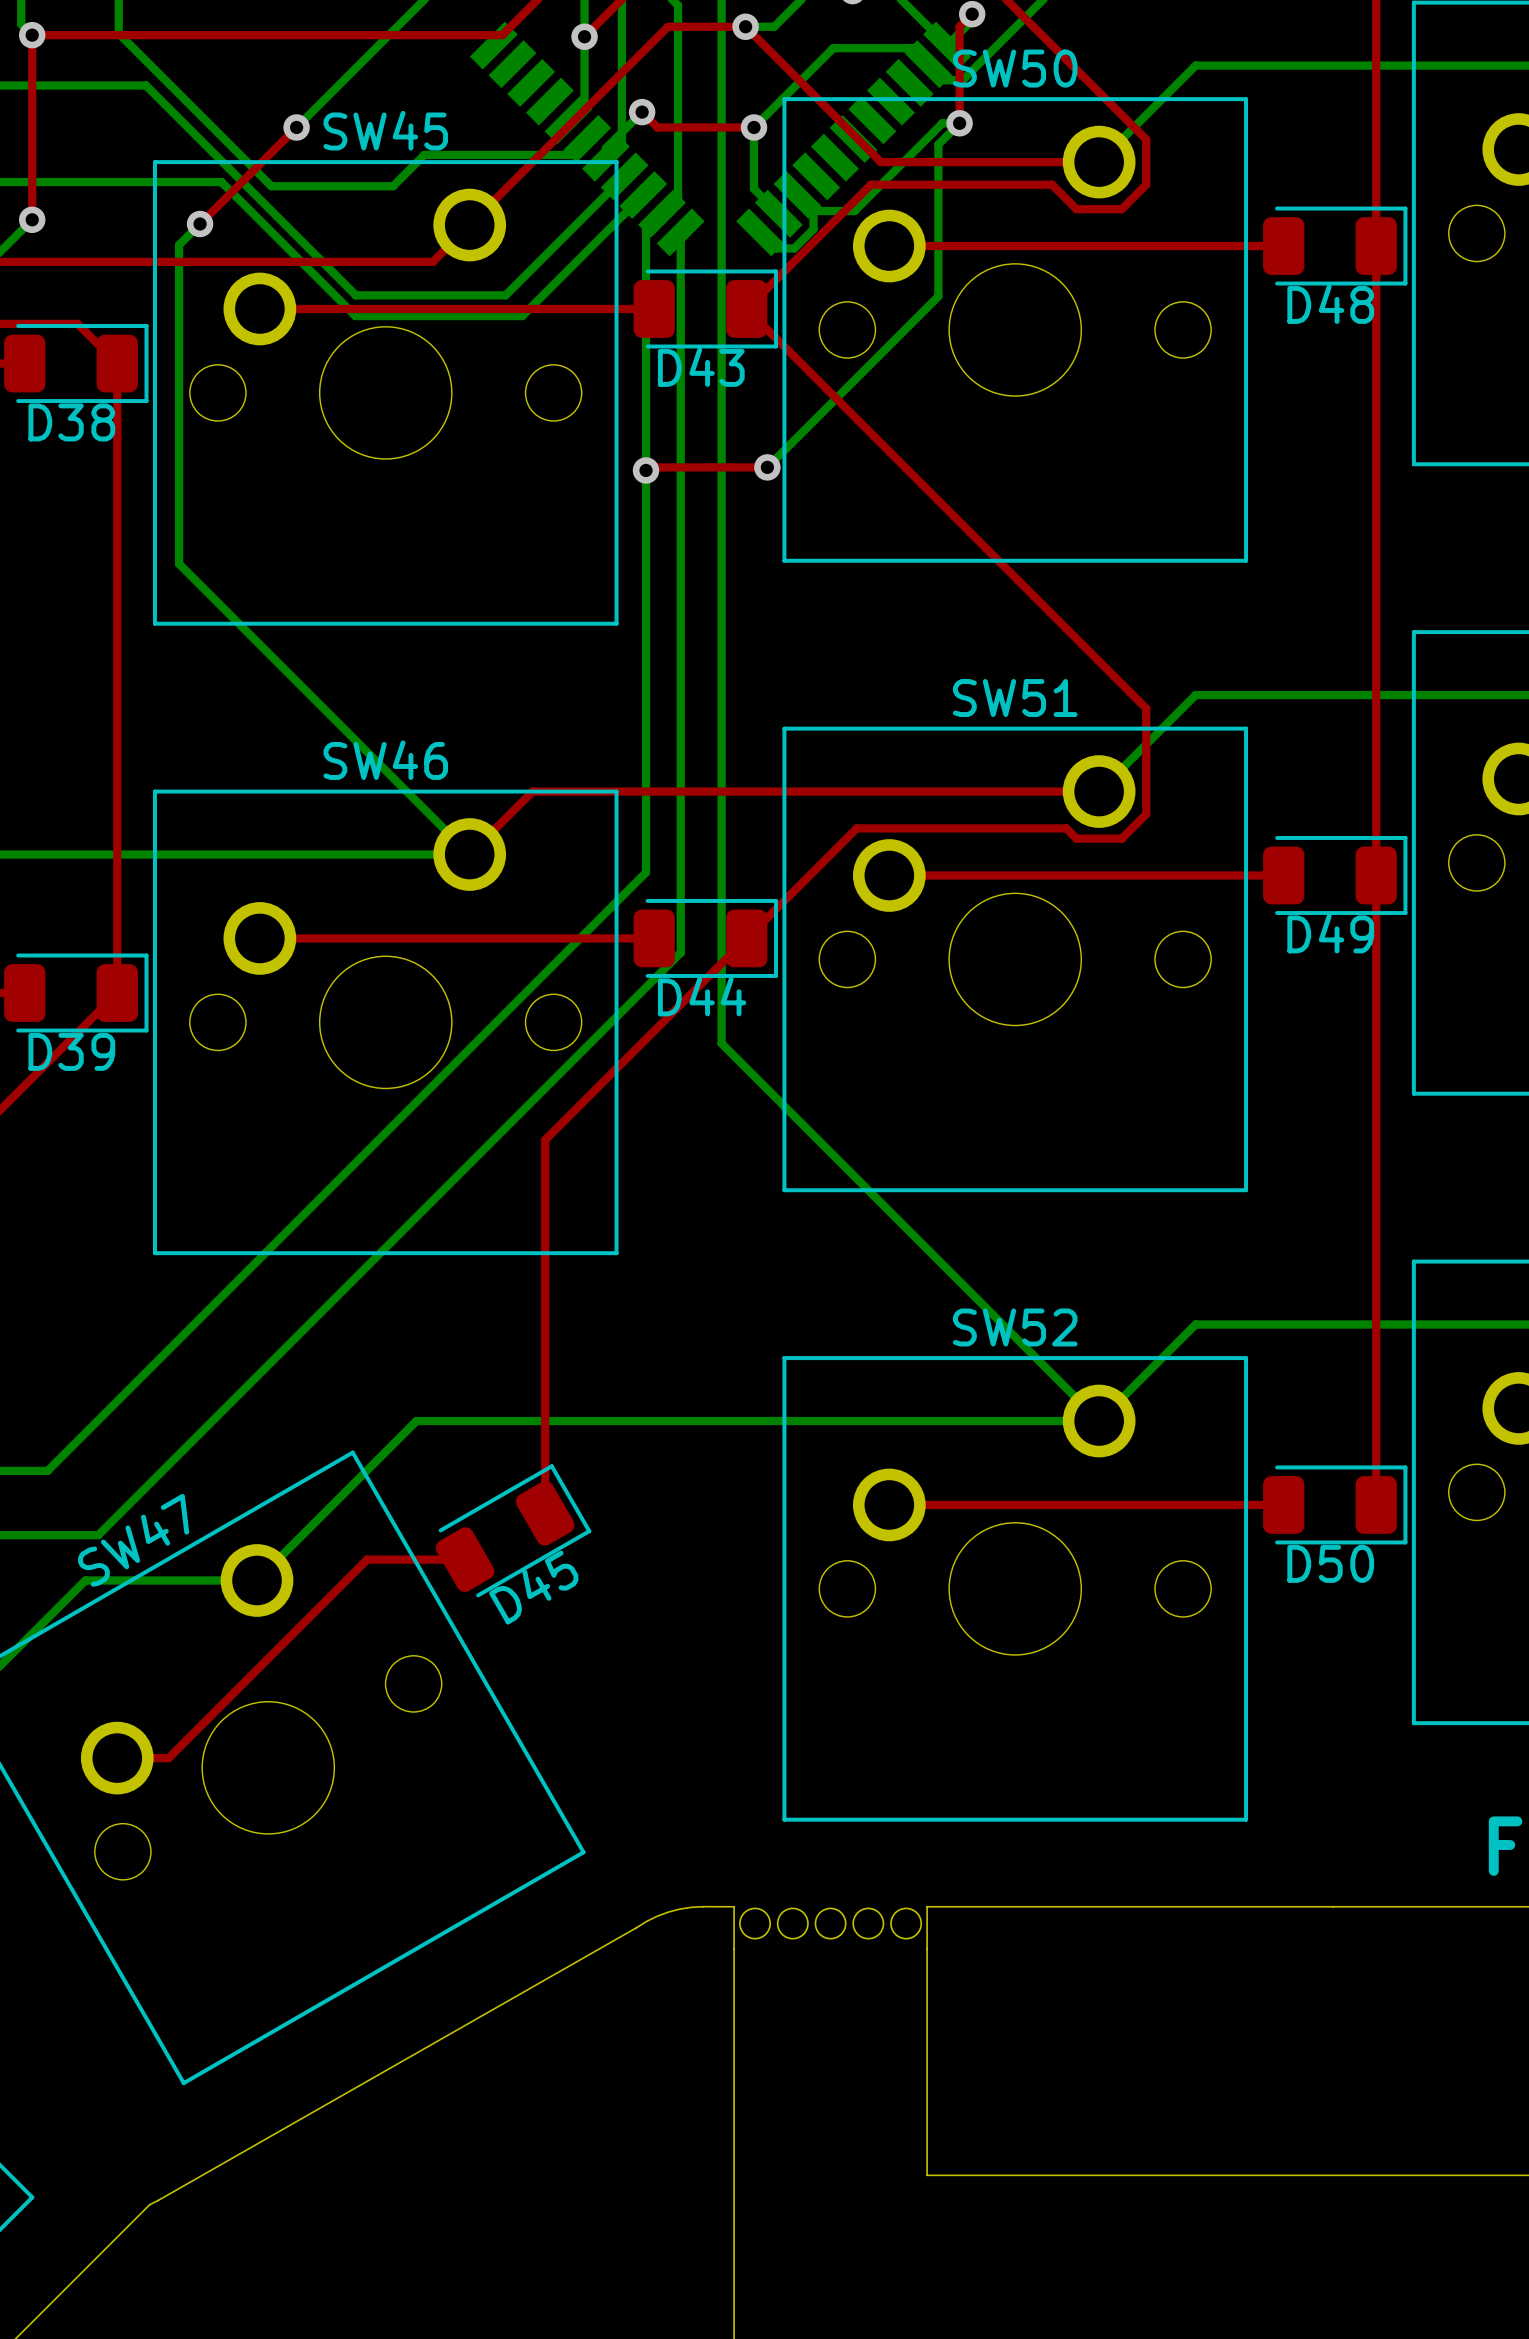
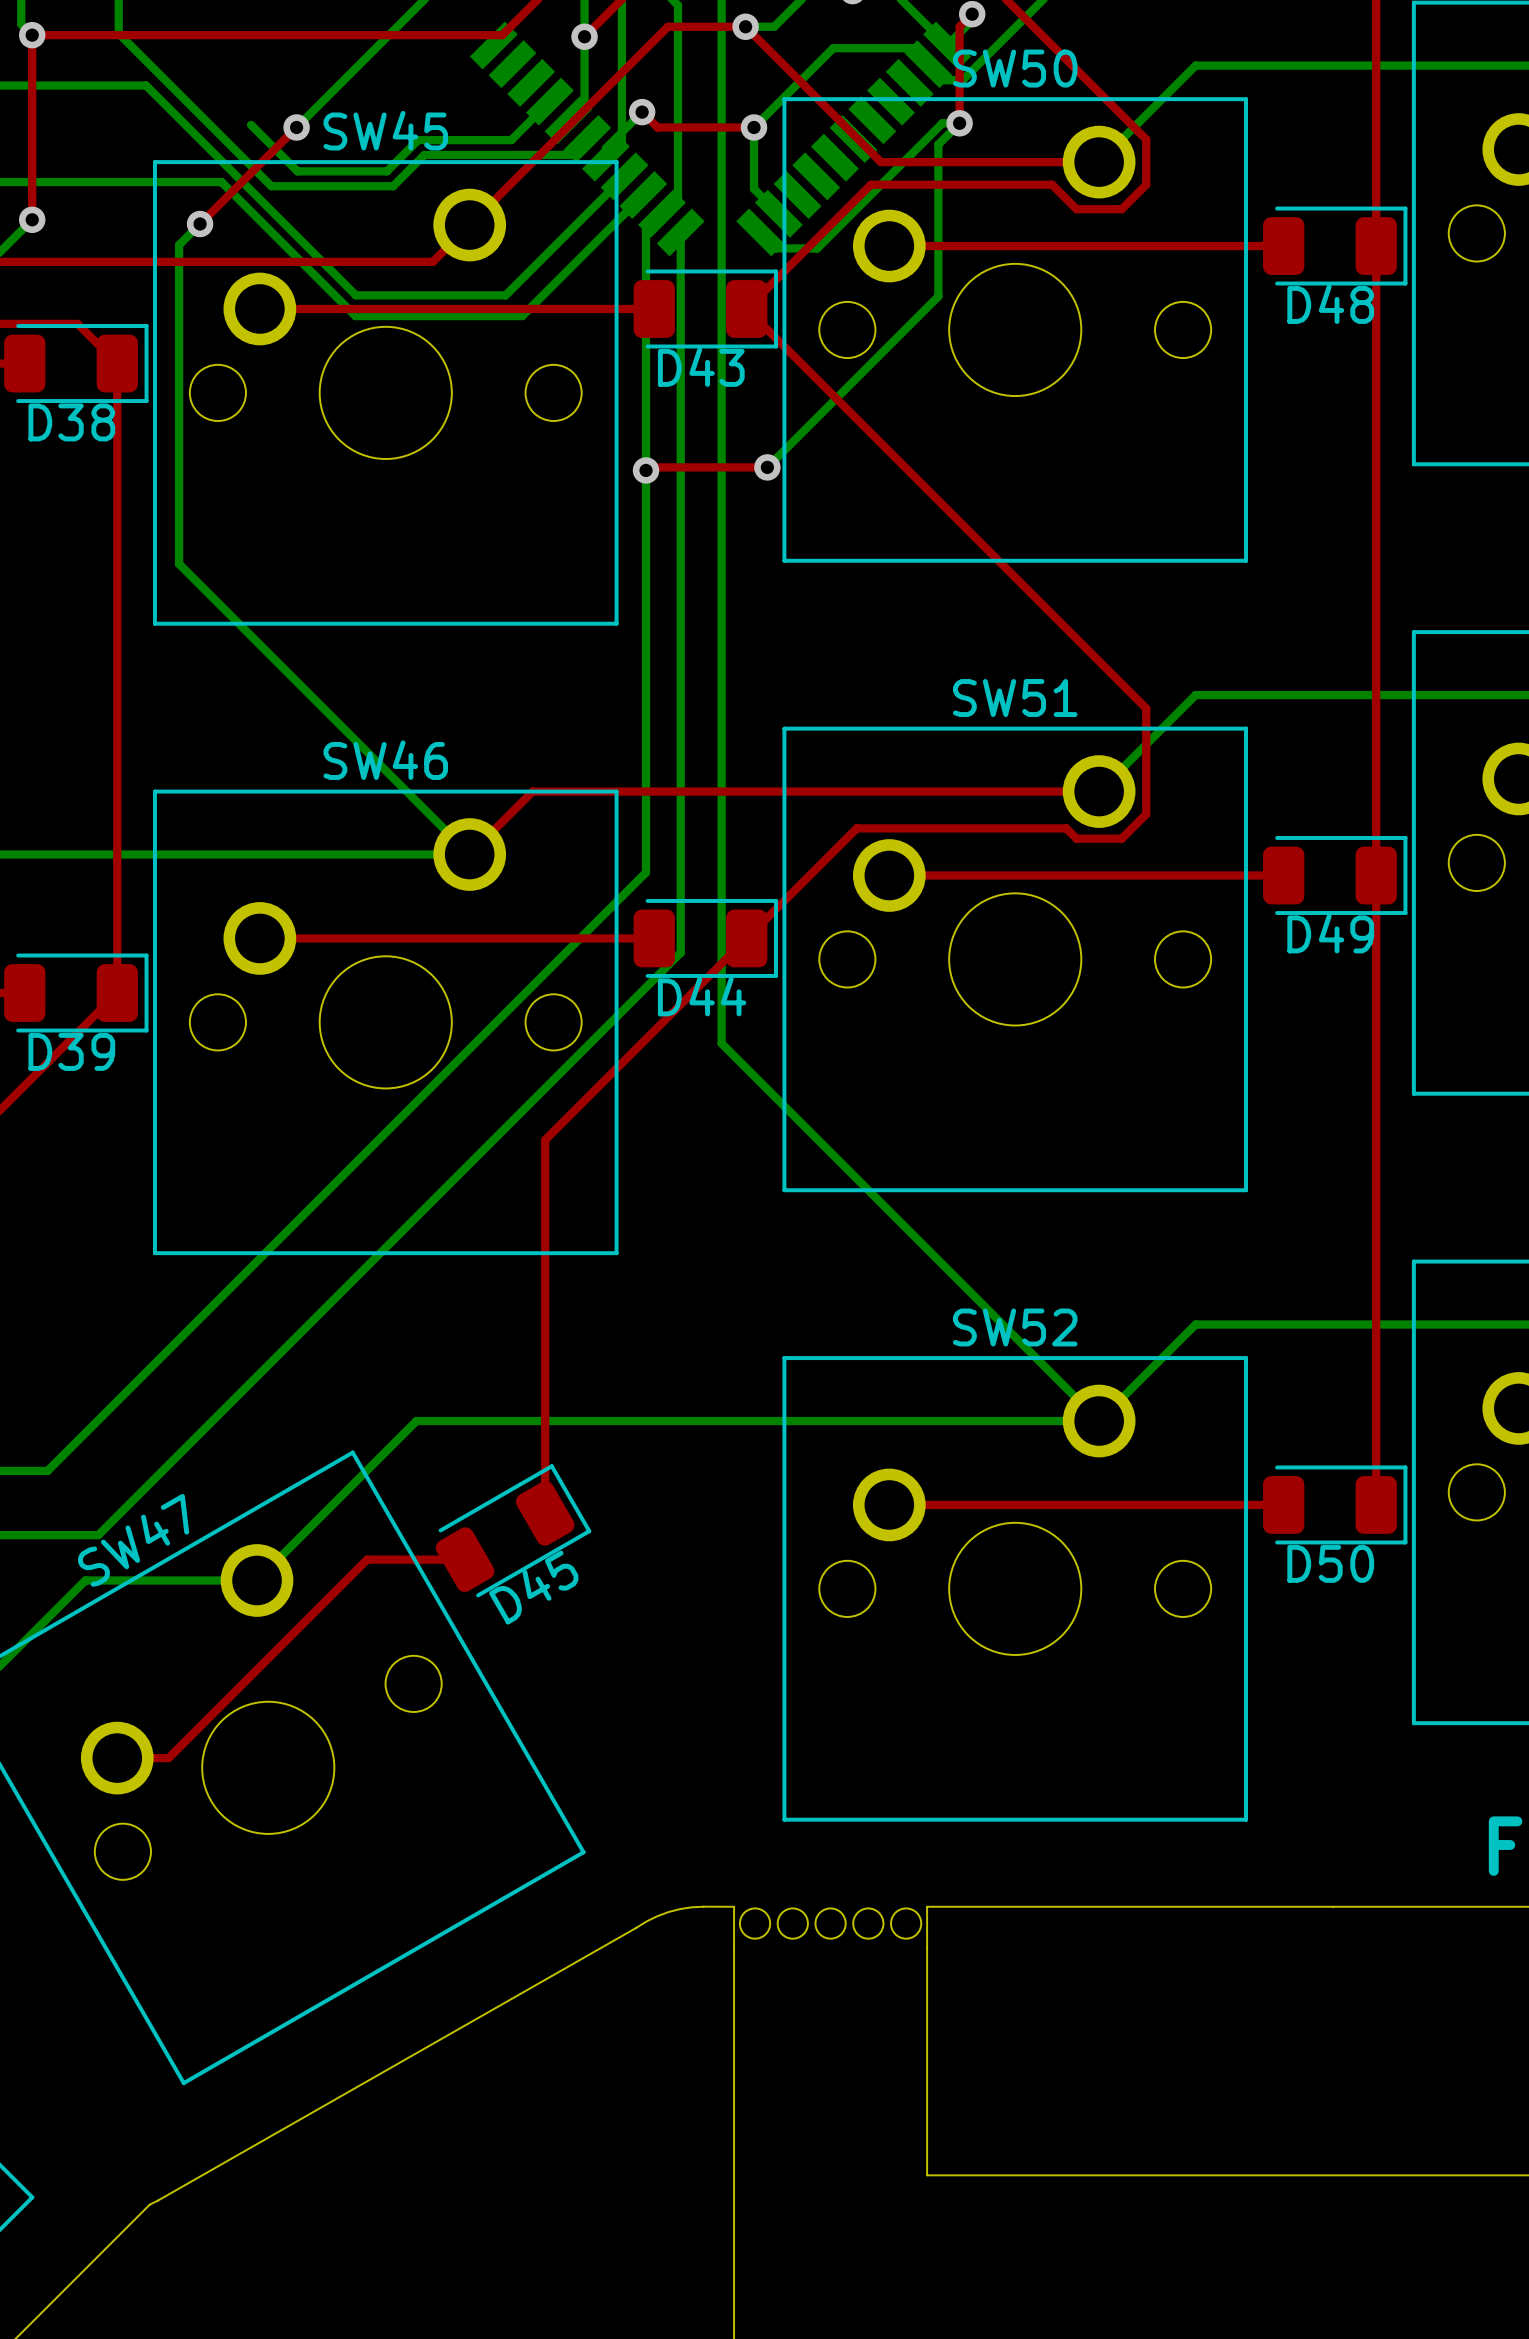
bottom track: none -> (549, 101) (511, 140) (418, 140) (386, 171) (297, 171) (251, 124)
bottom track: (813, 211) (813, 229) (794, 248) -> (854, 211) (817, 248) (794, 248)
bottom track: (813, 211) (854, 211) -> none

